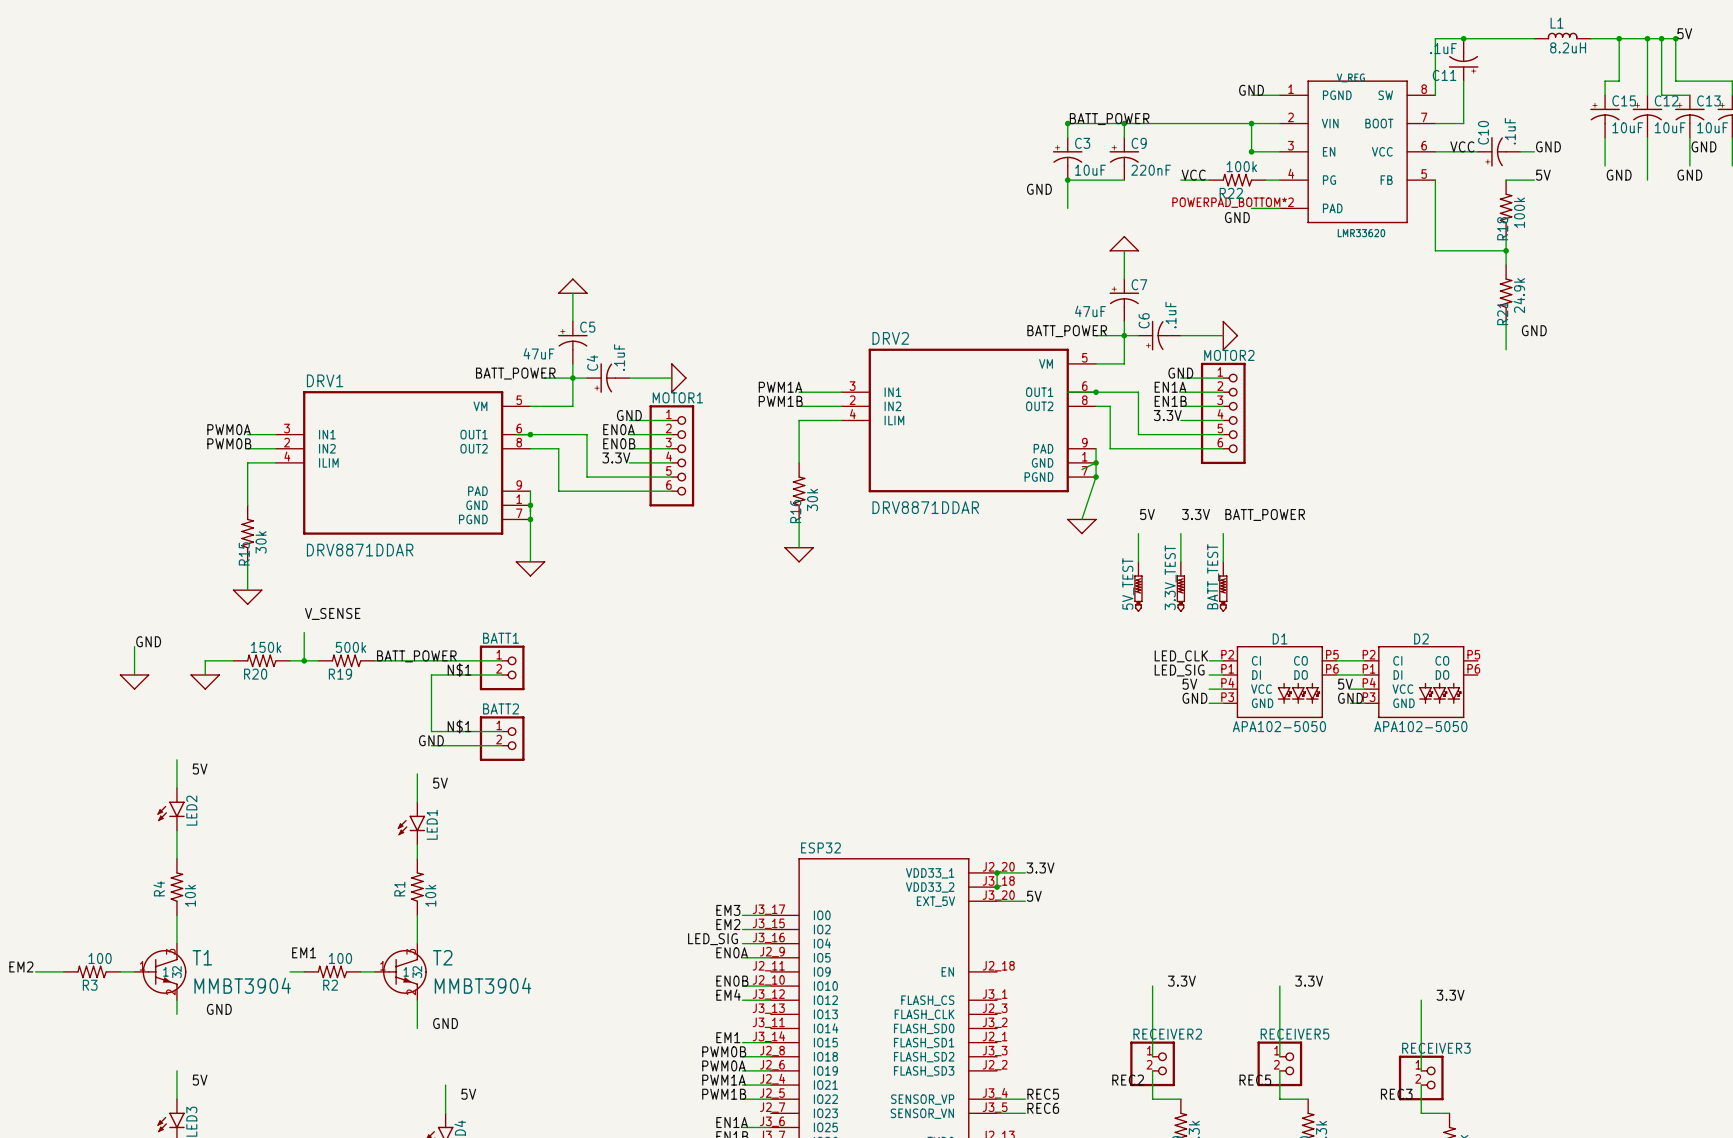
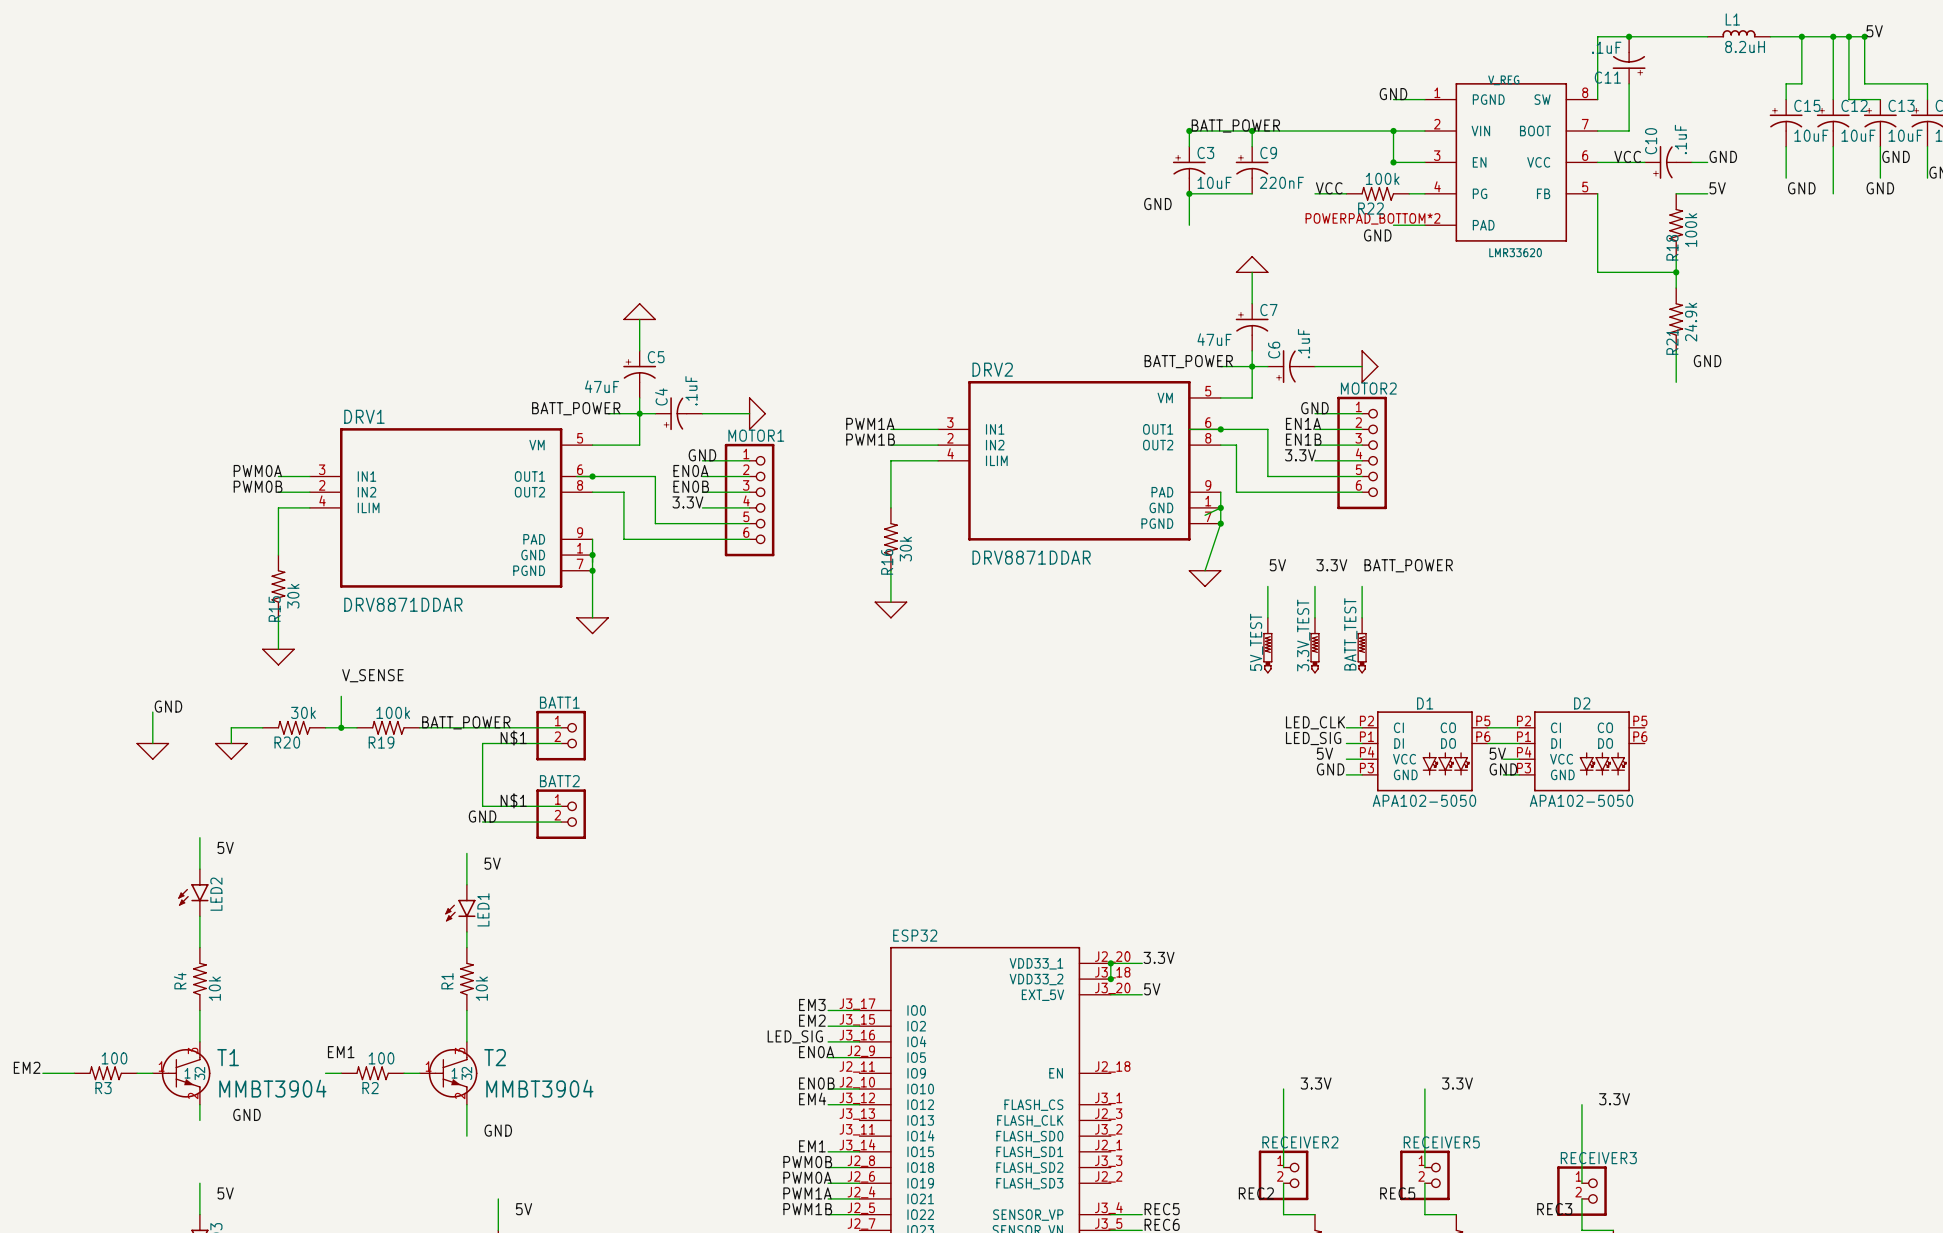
R20 value: 150k (266, 647) -> 30k (303, 712)
R19 value: 500k (351, 647) -> 100k (393, 712)

